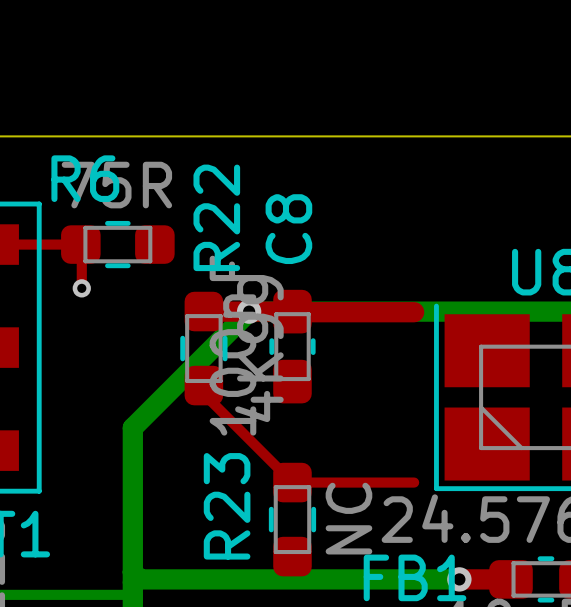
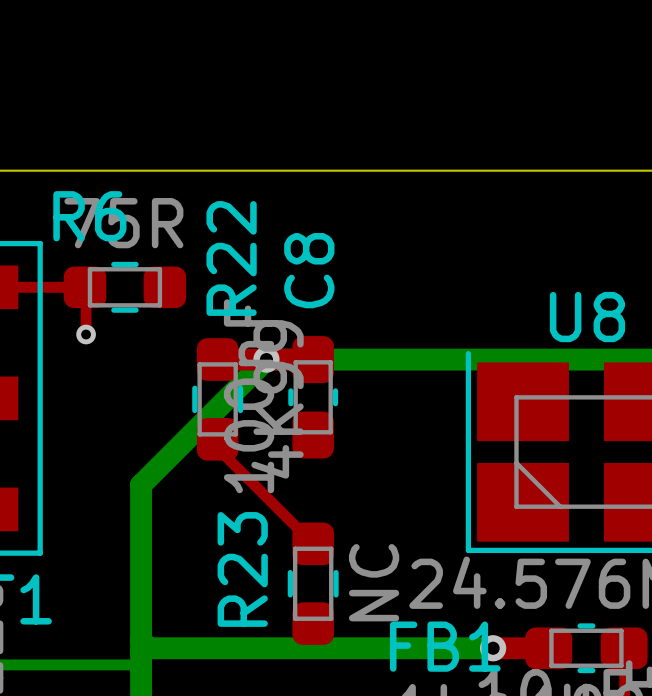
top track: (292, 311) (413, 311) -> none
top track: (292, 482) (414, 482) -> none

